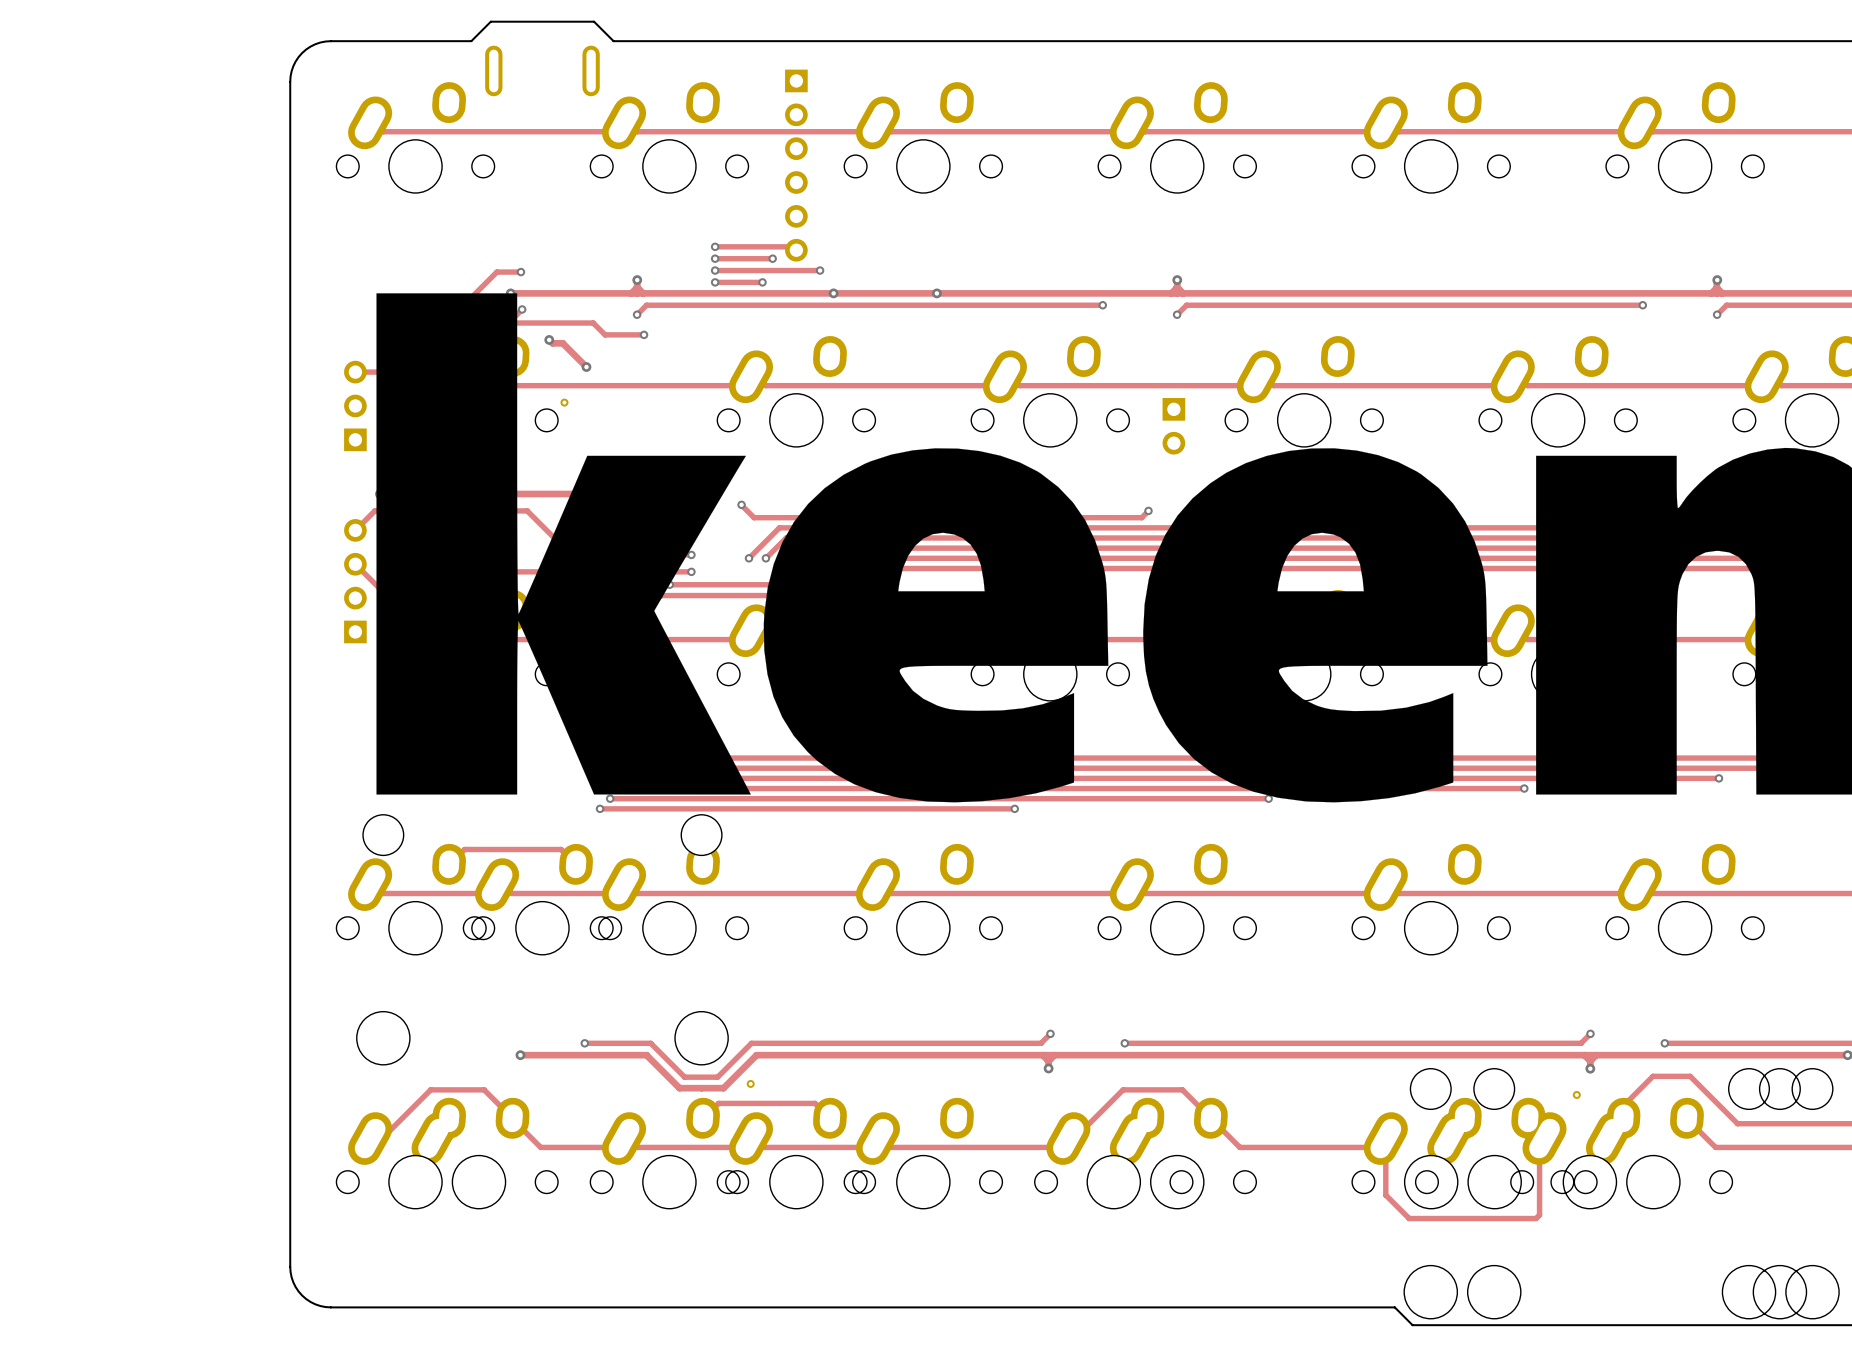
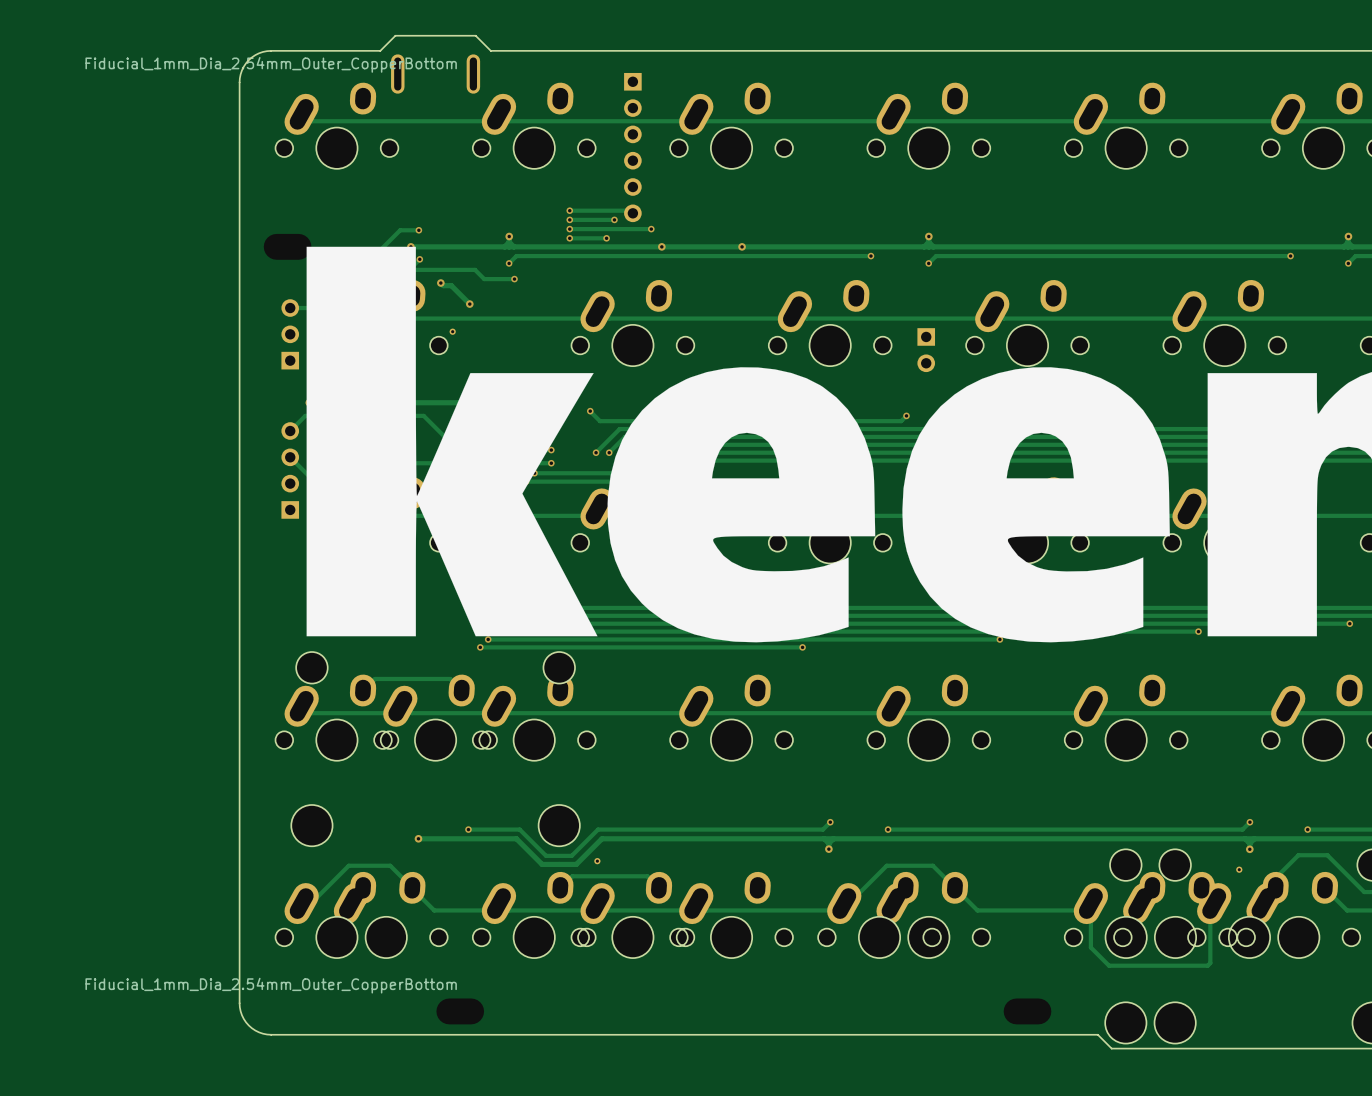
part: none -> Fiducial_1mm_Dia_2.54mm_Outer_CopperBottom (271, 64)
part: none -> Fiducial_1mm_Dia_2.54mm_Outer_CopperBottom (271, 985)

